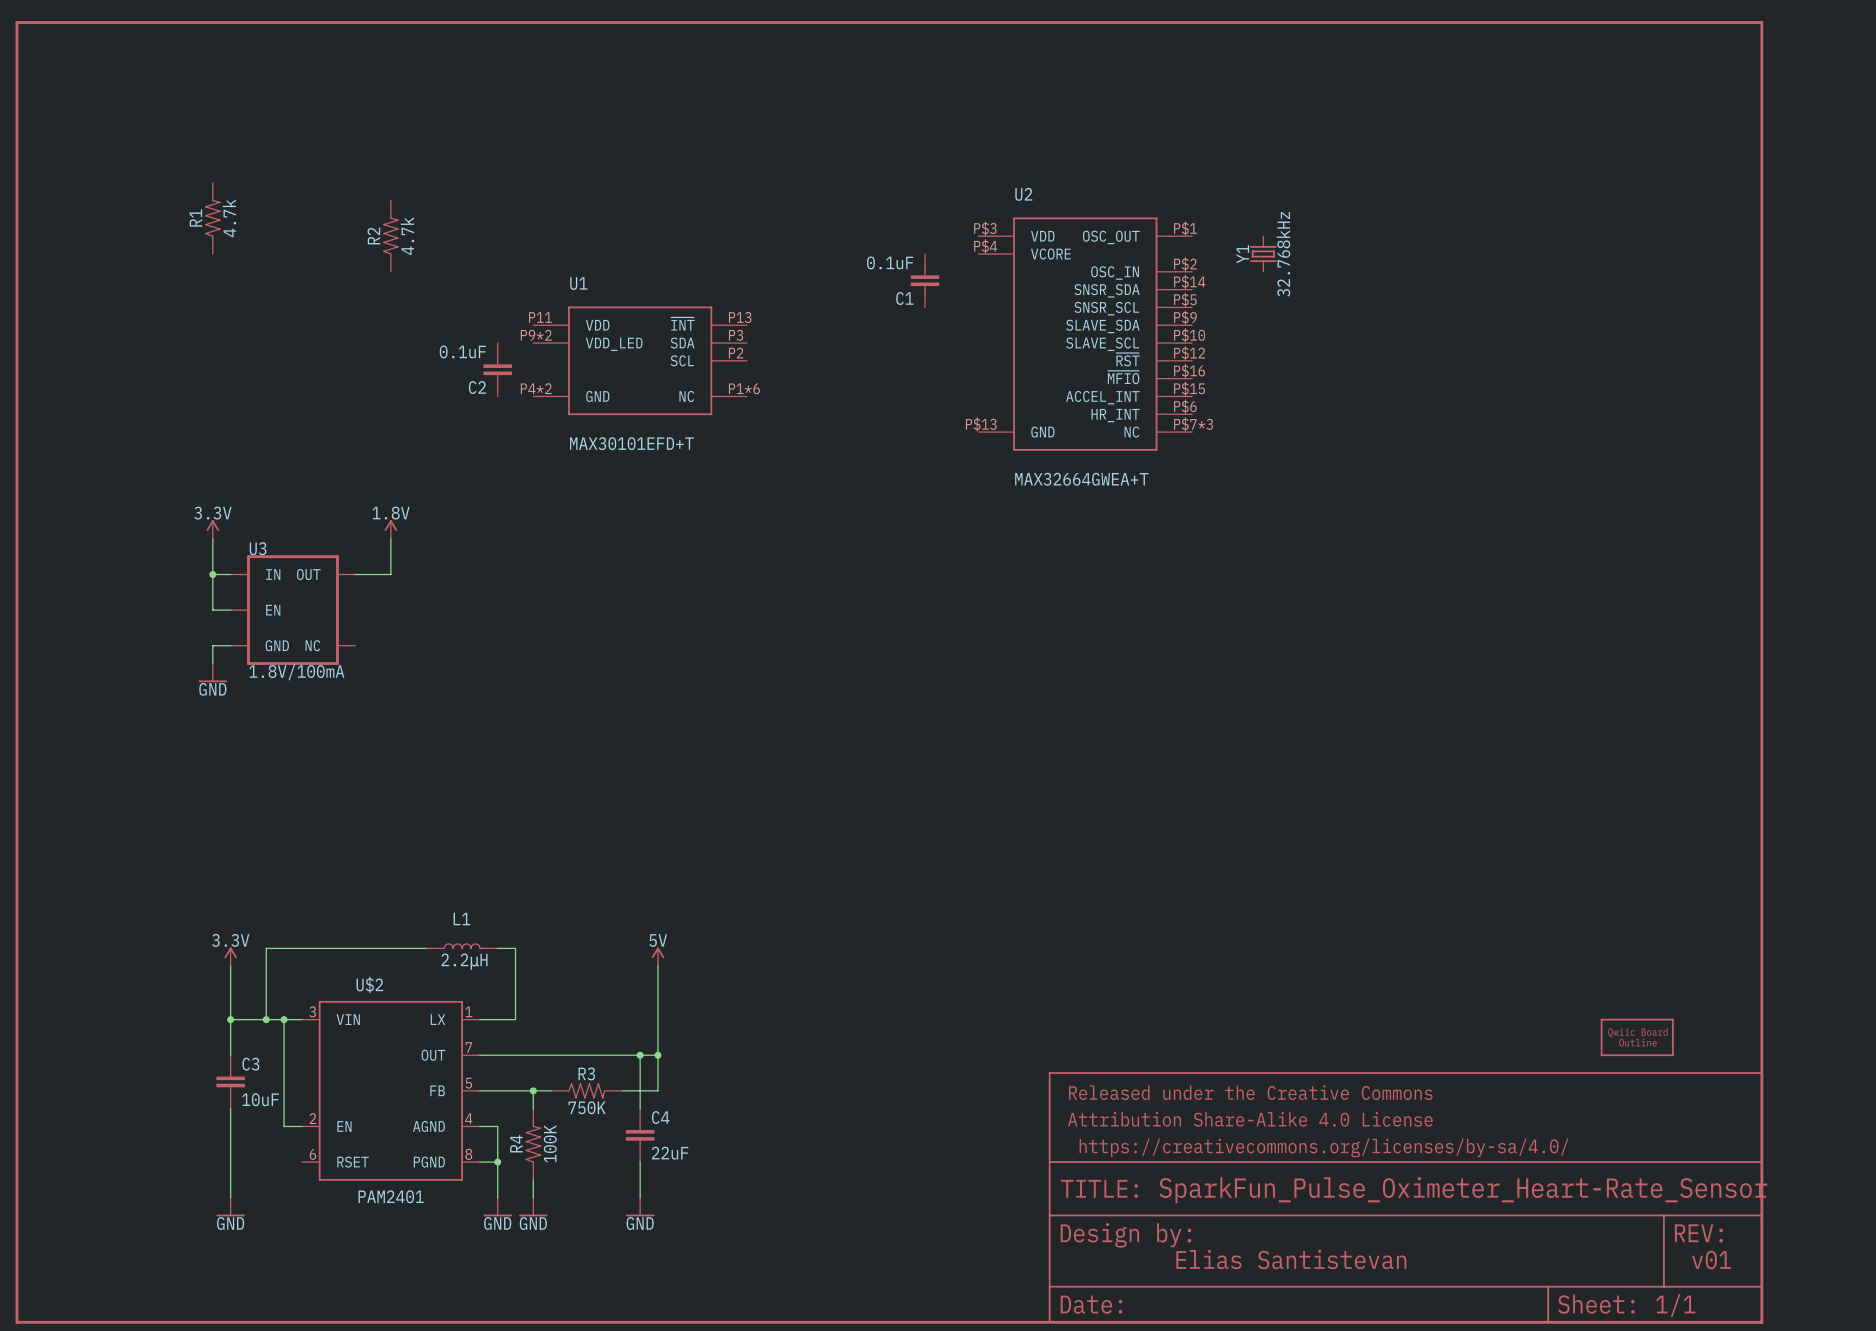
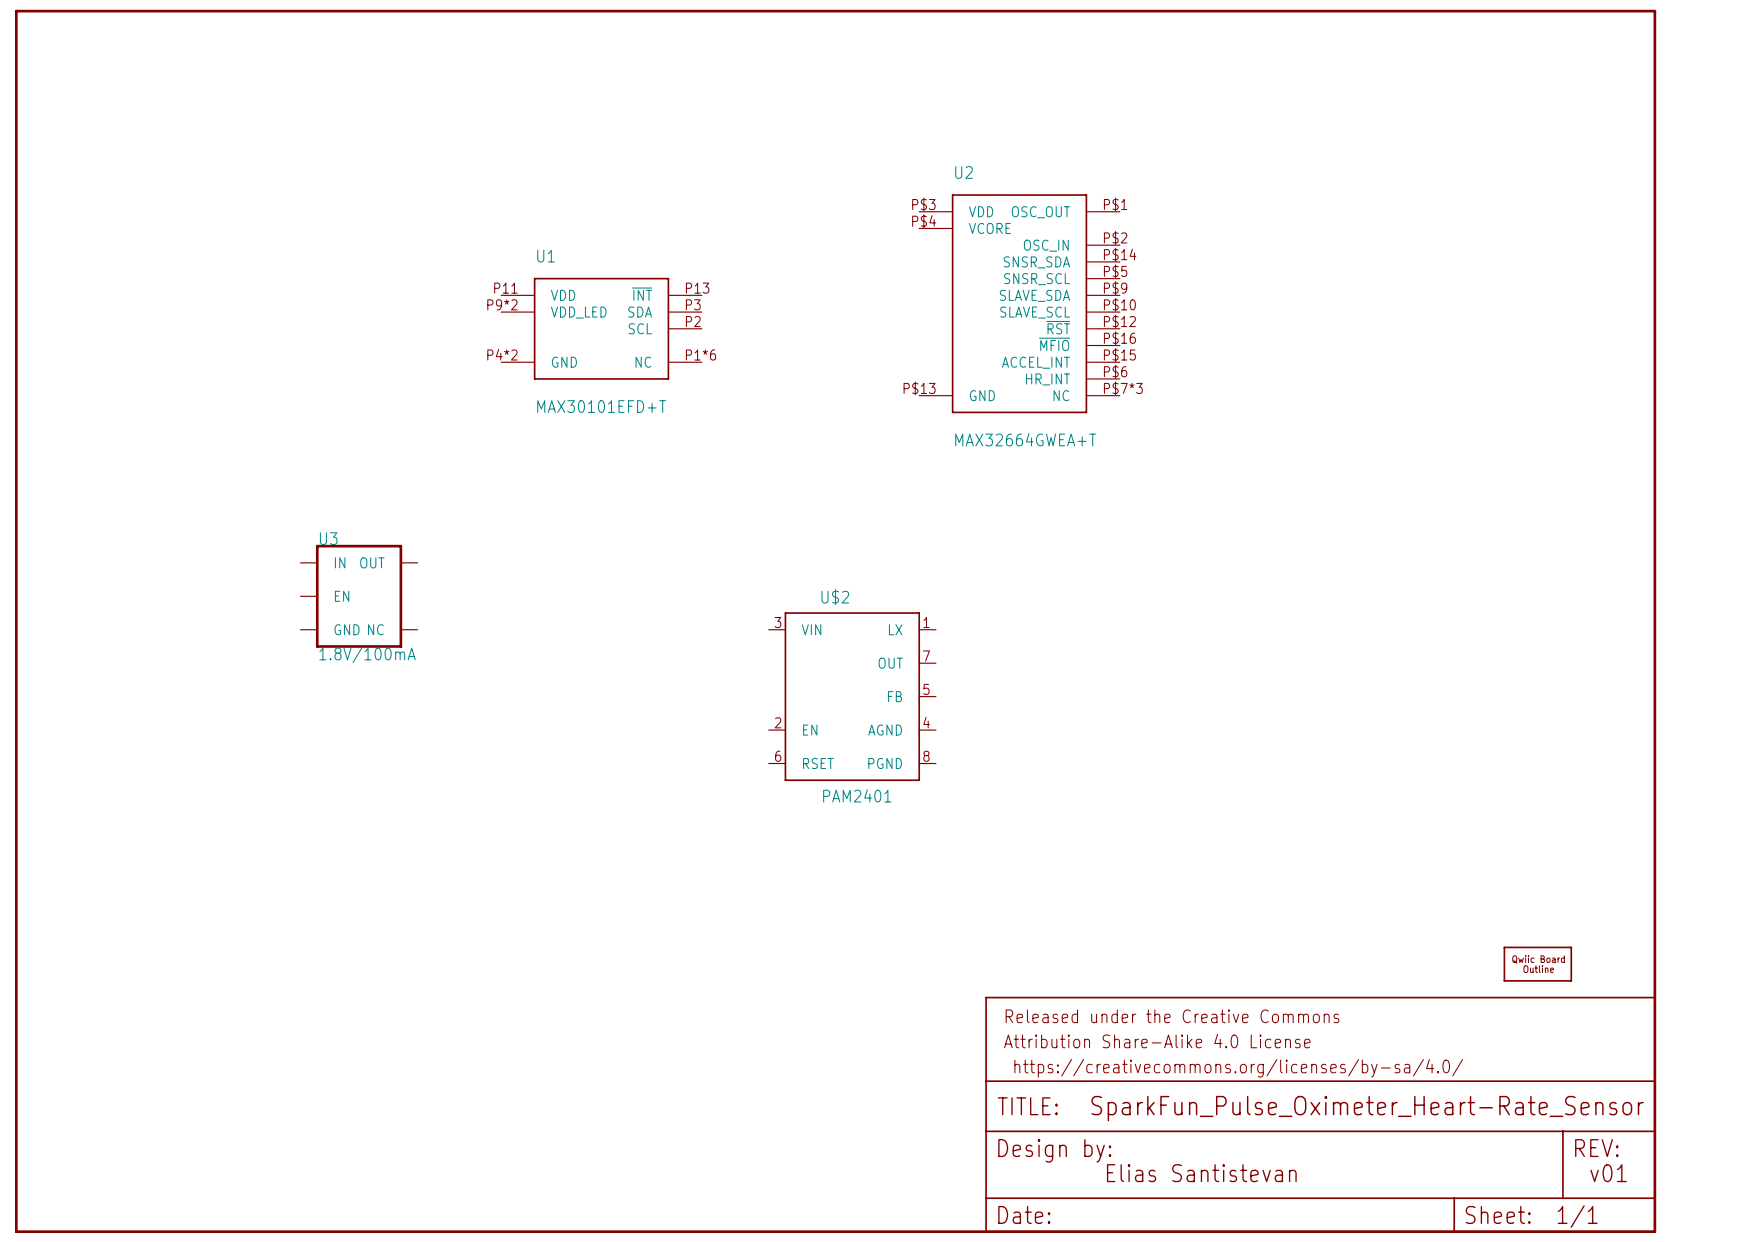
R1: 4.7k (212, 218) -> none
R2: 4.7k (390, 236) -> none
Y1: 32.768kHz (1263, 254) -> none
C1: 0.1uF (925, 280) -> none
C2: 0.1uF (497, 369) -> none
power symbol: 3.3V (212, 529) -> none
power symbol: 1.8V (390, 529) -> none
wire: (212, 538) (212, 610) (230, 610) -> none
wire: (390, 538) (390, 574) (355, 574) -> none
wire: (212, 574) (230, 574) -> none
junction: (212, 574) -> none
U3 position: (292, 610) -> (359, 596)
wire: (230, 645) (212, 645) (212, 663) -> none
power symbol: GND (212, 672) -> none
L1: 2.2μH (462, 946) -> none
wire: (426, 948) (266, 948) (266, 1019) -> none
wire: (497, 948) (515, 948) (515, 1019) (479, 1019) -> none
power symbol: 3.3V (230, 956) -> none
power symbol: 5V (657, 956) -> none
wire: (230, 966) (230, 1055) -> none
wire: (657, 966) (657, 1090) (622, 1090) -> none
wire: (230, 1019) (301, 1019) -> none
junction: (230, 1019) -> none
junction: (266, 1019) -> none
wire: (284, 1019) (284, 1126) (301, 1126) -> none
junction: (284, 1019) -> none
wire: (479, 1055) (657, 1055) -> none
wire: (640, 1055) (640, 1108) -> none
junction: (640, 1055) -> none
junction: (657, 1055) -> none
C3: 10uF (230, 1081) -> none
U$2 position: (390, 1090) -> (852, 696)
wire: (479, 1090) (551, 1090) -> none
wire: (533, 1090) (533, 1108) -> none
junction: (533, 1090) -> none
R3: 750K (586, 1090) -> none
wire: (230, 1108) (230, 1197) -> none
wire: (479, 1126) (497, 1126) (497, 1197) -> none
C4: 22uF (640, 1135) -> none
R4: 100K (533, 1144) -> none
wire: (479, 1162) (497, 1162) -> none
junction: (497, 1162) -> none
wire: (640, 1162) (640, 1197) -> none
wire: (533, 1179) (533, 1197) -> none
power symbol: GND (230, 1207) -> none
power symbol: GND (497, 1207) -> none
power symbol: GND (533, 1207) -> none
power symbol: GND (640, 1207) -> none

